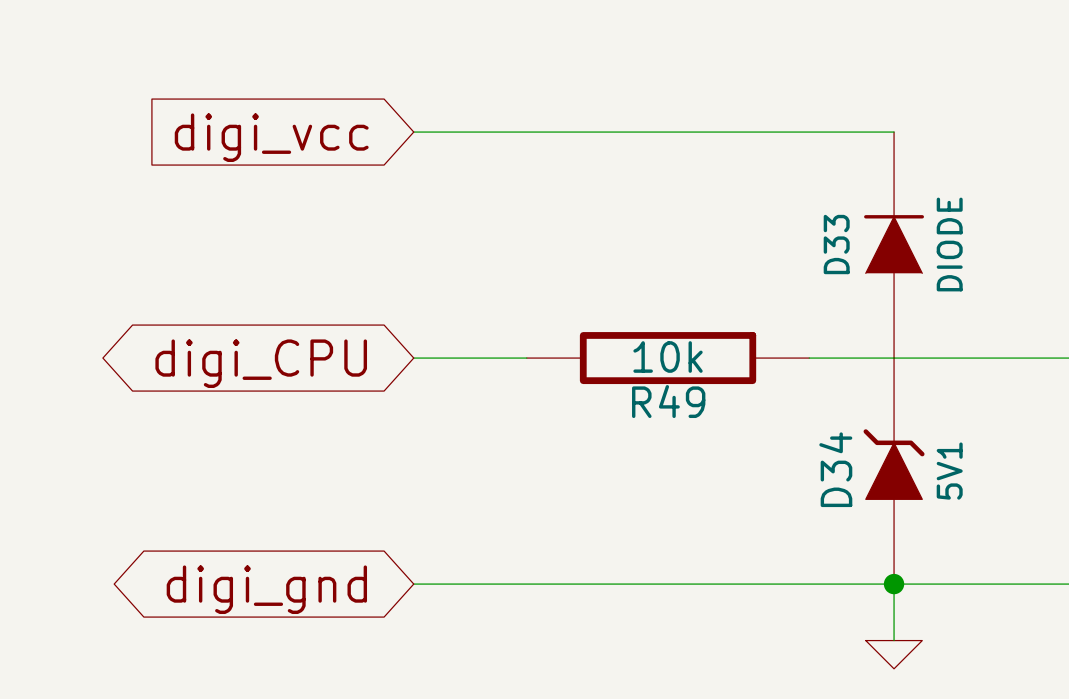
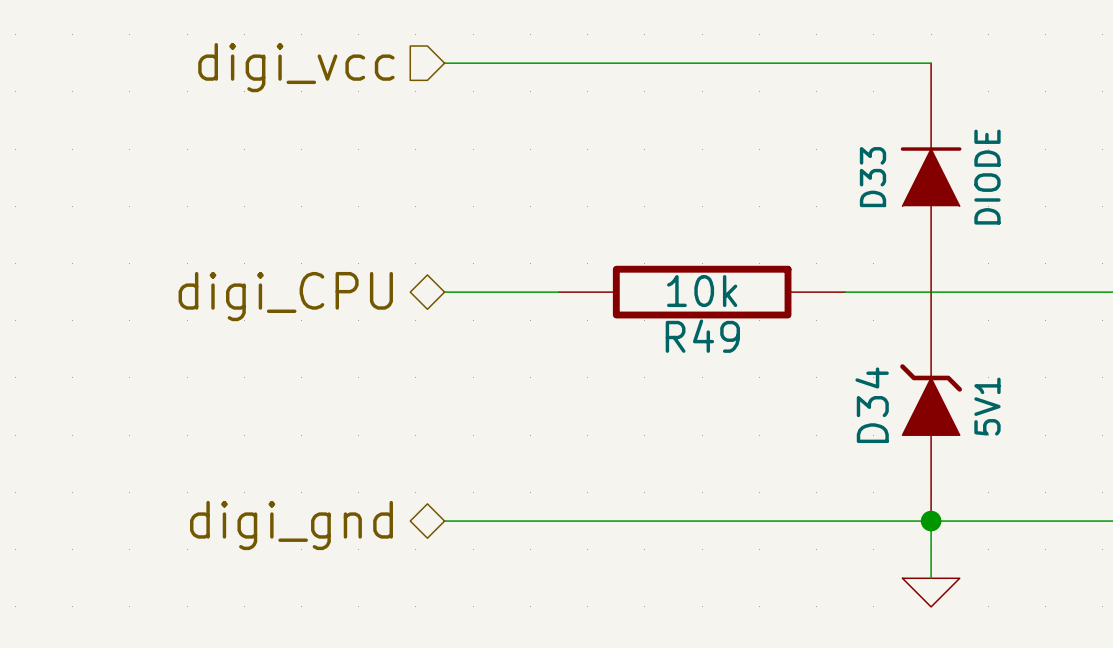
hierarchical label: none -> digi_vcc (296, 67)
global label: digi_vcc (271, 137) -> none
hierarchical label: none -> digi_CPU (285, 296)
global label: digi_CPU (261, 363) -> none
hierarchical label: none -> digi_gnd (291, 525)
global label: digi_gnd (266, 589) -> none

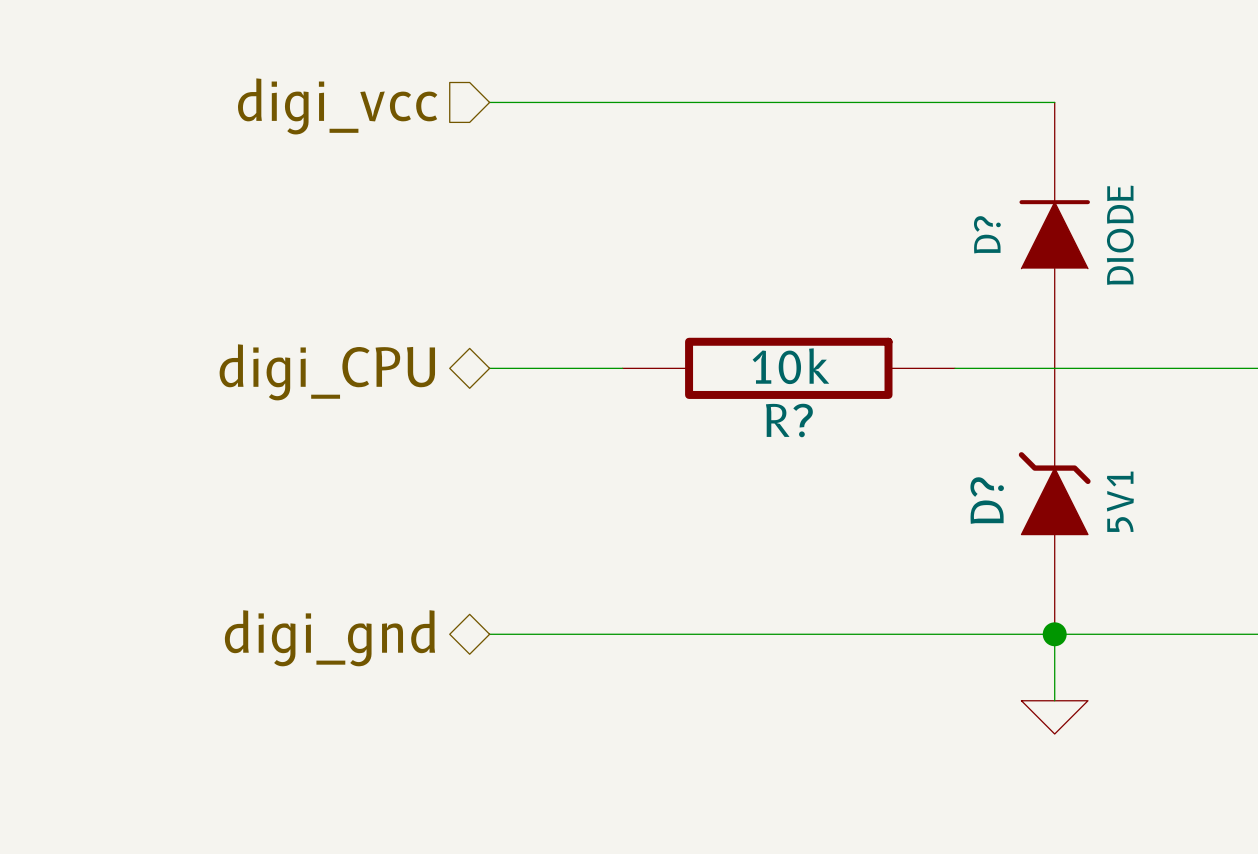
D33 name: D33 (873, 177) -> D? (987, 234)
R49 name: R49 (702, 336) -> R? (789, 420)
D34 name: D34 (872, 405) -> D? (987, 500)

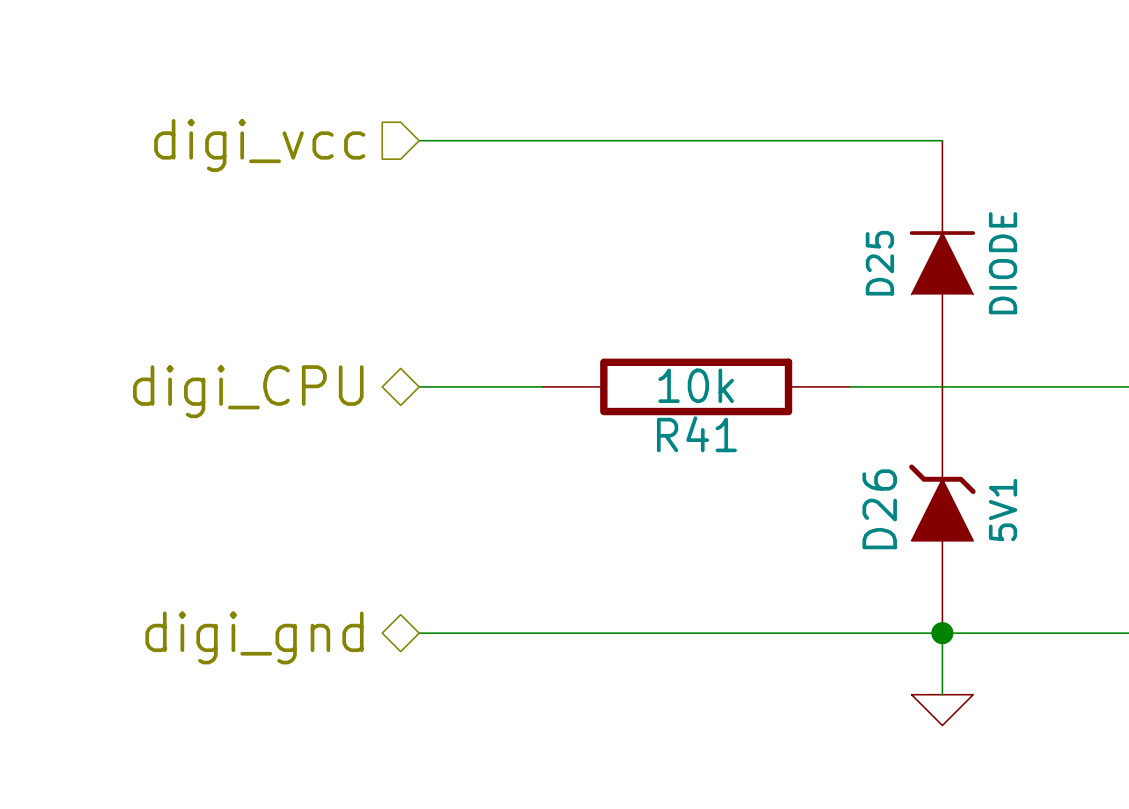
D? name: D? (987, 234) -> D25 (879, 263)
R? name: R? (789, 420) -> R41 (696, 434)
D? name: D? (987, 500) -> D26 (879, 509)

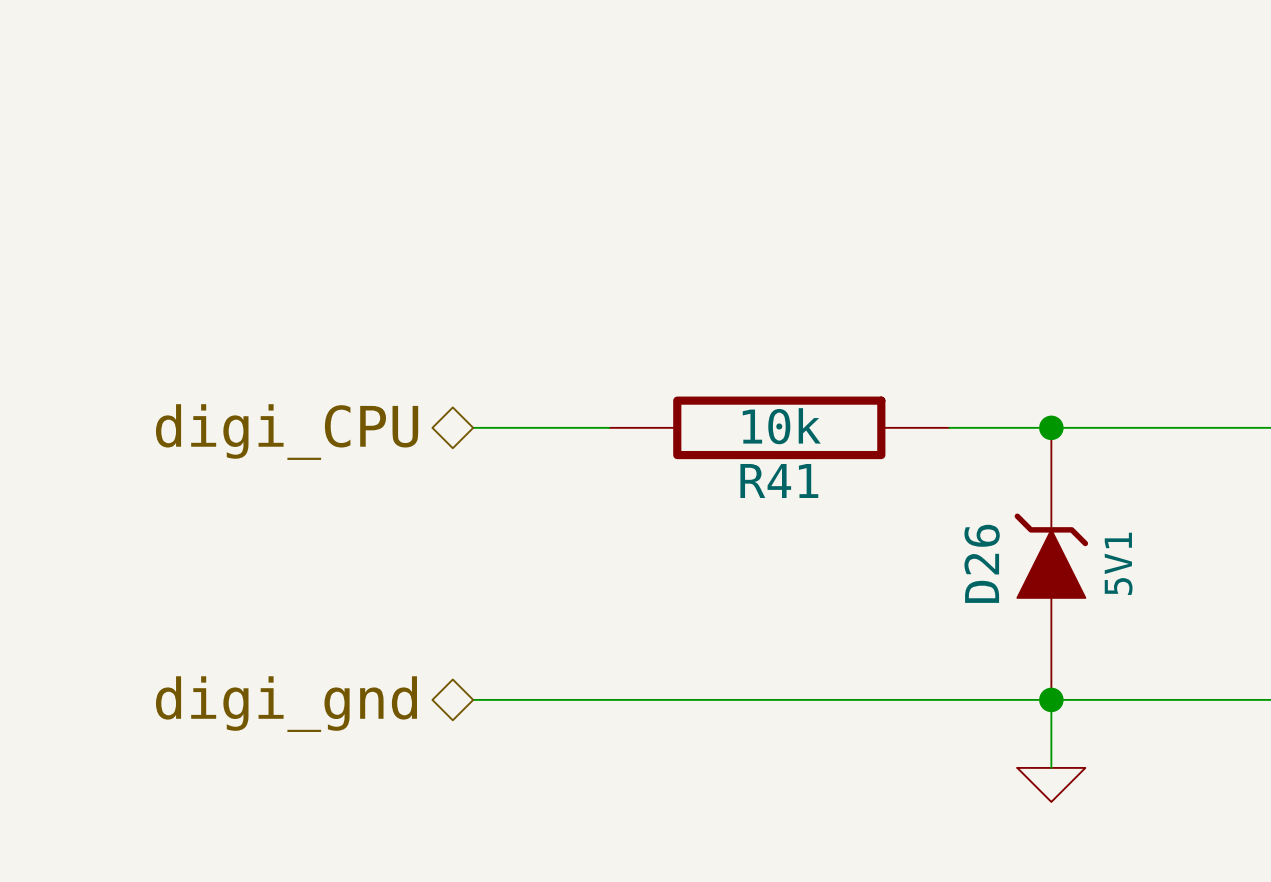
wire: (419, 140) (942, 140) -> none
hierarchical label: digi_vcc (259, 145) -> none
D25: DIODE (942, 263) -> none
junction: none -> (1051, 427)

